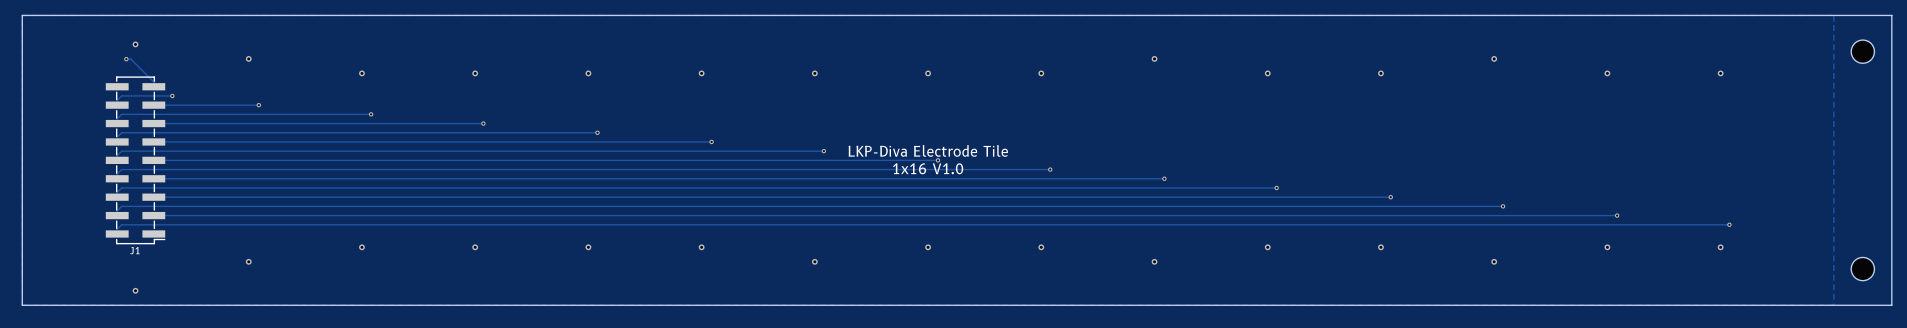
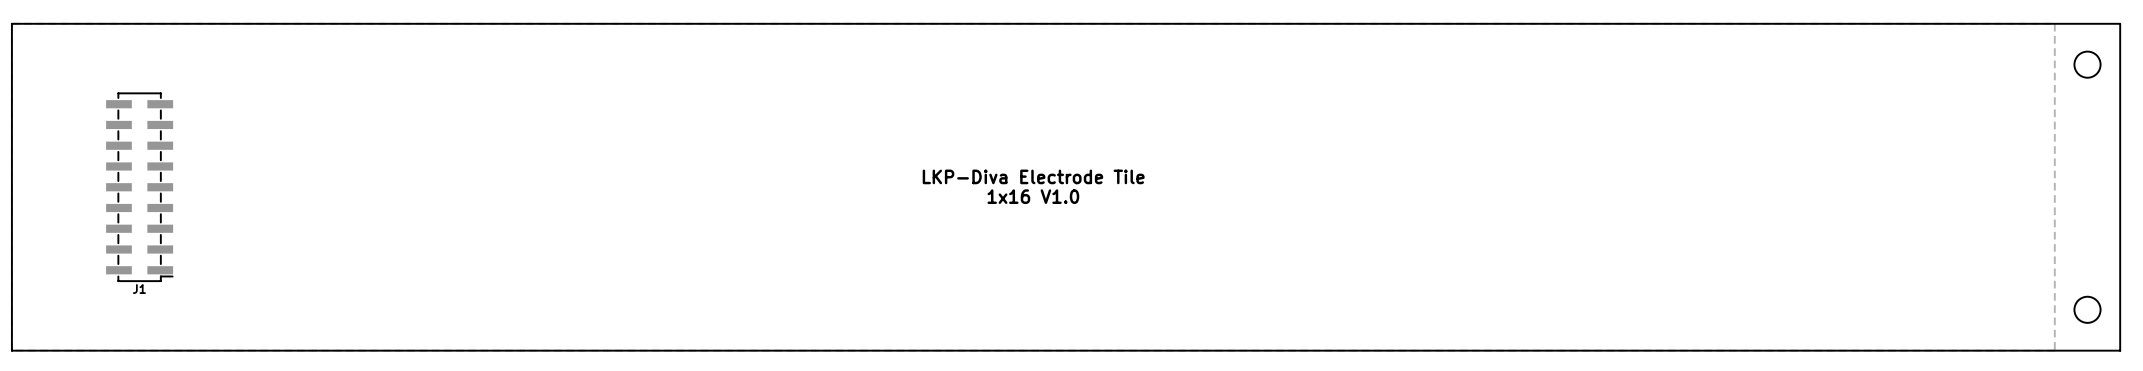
via: (135, 44) -> none
via: (248, 58) -> none
via: (1154, 58) -> none
via: (1494, 58) -> none
track: (126, 59) (130, 59) (153, 82) (153, 86) -> none
via: (126, 59) -> none
via: (361, 73) -> none
via: (475, 73) -> none
via: (588, 73) -> none
via: (701, 73) -> none
via: (814, 73) -> none
via: (928, 73) -> none
via: (1041, 73) -> none
via: (1267, 73) -> none
via: (1380, 73) -> none
via: (1607, 73) -> none
via: (1720, 73) -> none
track: (172, 95) (121, 95) (117, 100) (117, 105) -> none
via: (172, 95) -> none
track: (258, 105) (153, 105) -> none
via: (258, 105) -> none
track: (371, 114) (121, 114) (117, 118) (117, 123) -> none
via: (371, 114) -> none
track: (483, 123) (153, 123) -> none
via: (483, 123) -> none
track: (597, 132) (121, 132) (117, 137) (117, 141) -> none
via: (597, 132) -> none
track: (711, 141) (153, 141) -> none
via: (711, 141) -> none
track: (823, 151) (121, 151) (117, 155) (117, 160) -> none
via: (823, 151) -> none
track: (938, 160) (153, 160) -> none
via: (938, 160) -> none
track: (1050, 169) (121, 169) (117, 174) (117, 178) -> none
via: (1050, 169) -> none
track: (1164, 178) (153, 178) -> none
via: (1164, 178) -> none
track: (1276, 187) (121, 187) (117, 192) (117, 197) -> none
via: (1276, 187) -> none
track: (1390, 197) (153, 197) -> none
via: (1390, 197) -> none
track: (1503, 206) (121, 206) (117, 210) (117, 215) -> none
via: (1503, 206) -> none
track: (1617, 215) (153, 215) -> none
via: (1617, 215) -> none
track: (1729, 224) (121, 224) (117, 229) (117, 233) -> none
via: (1729, 224) -> none
via: (361, 247) -> none
via: (475, 247) -> none
via: (588, 247) -> none
via: (701, 247) -> none
via: (928, 247) -> none
via: (1041, 247) -> none
via: (1267, 247) -> none
via: (1380, 247) -> none
via: (1607, 247) -> none
via: (1720, 247) -> none
via: (248, 261) -> none
via: (814, 261) -> none
via: (1154, 261) -> none
via: (1494, 261) -> none
via: (135, 290) -> none

